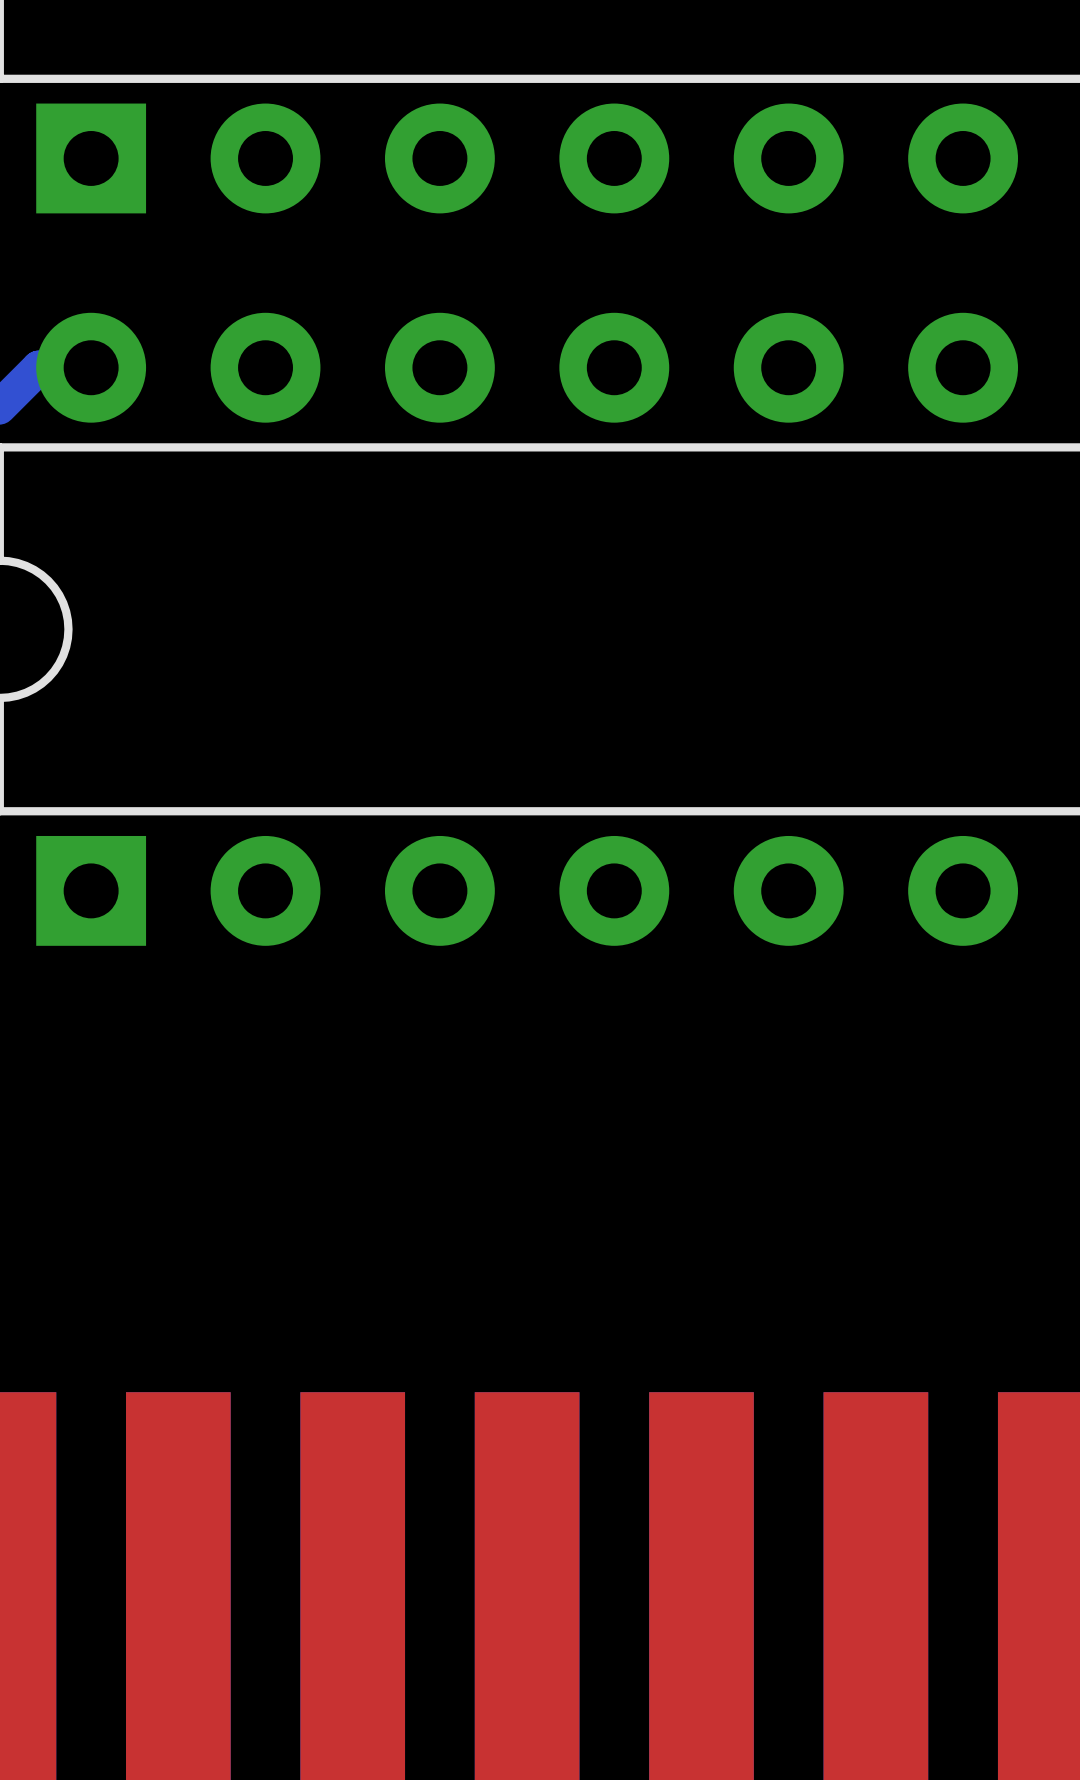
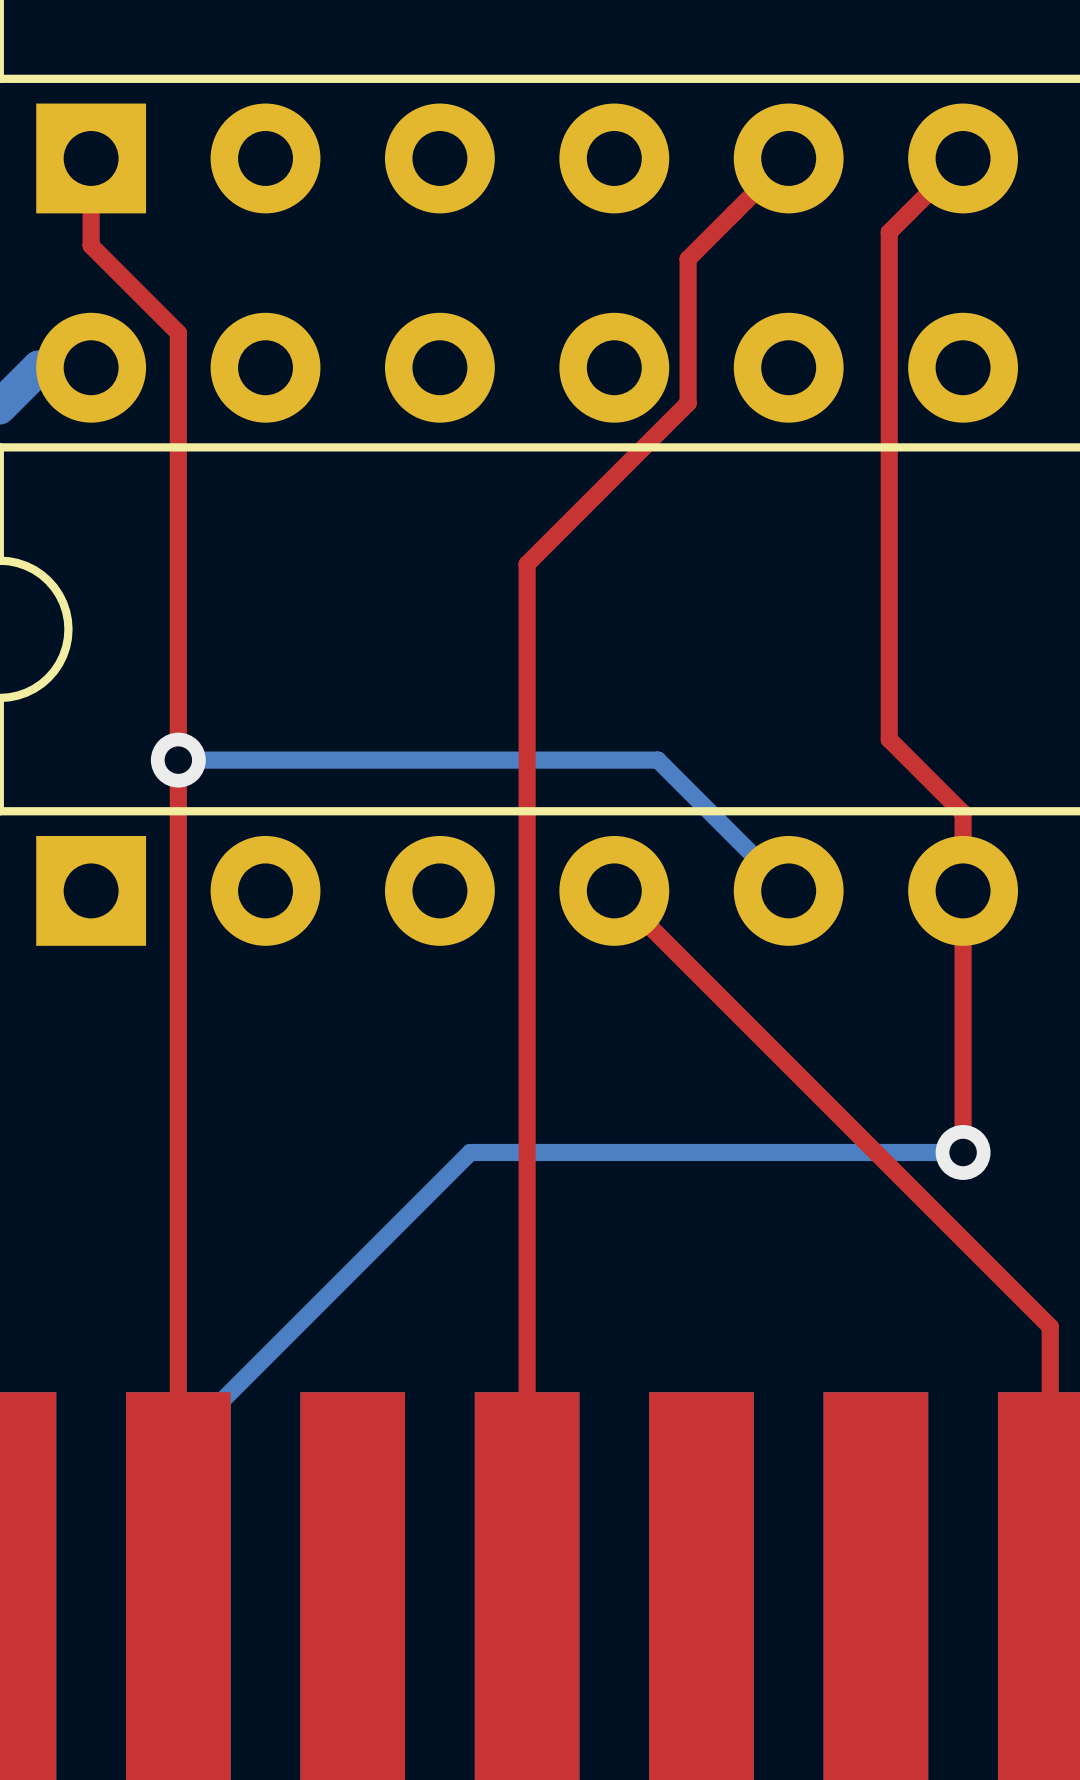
top track: none -> (91, 158) (91, 245) (178, 332) (178, 1666)
top track: none -> (788, 158) (688, 259) (688, 403) (527, 564) (527, 1666)
top track: none -> (963, 158) (889, 232) (889, 739) (963, 813) (963, 1152)
bottom track: none -> (178, 760) (657, 760) (788, 890)
via: none -> (178, 760)
top track: none -> (614, 890) (1050, 1326) (1050, 1666)
bottom track: none -> (963, 1152) (470, 1152) (178, 1444) (178, 1666)
via: none -> (963, 1152)

